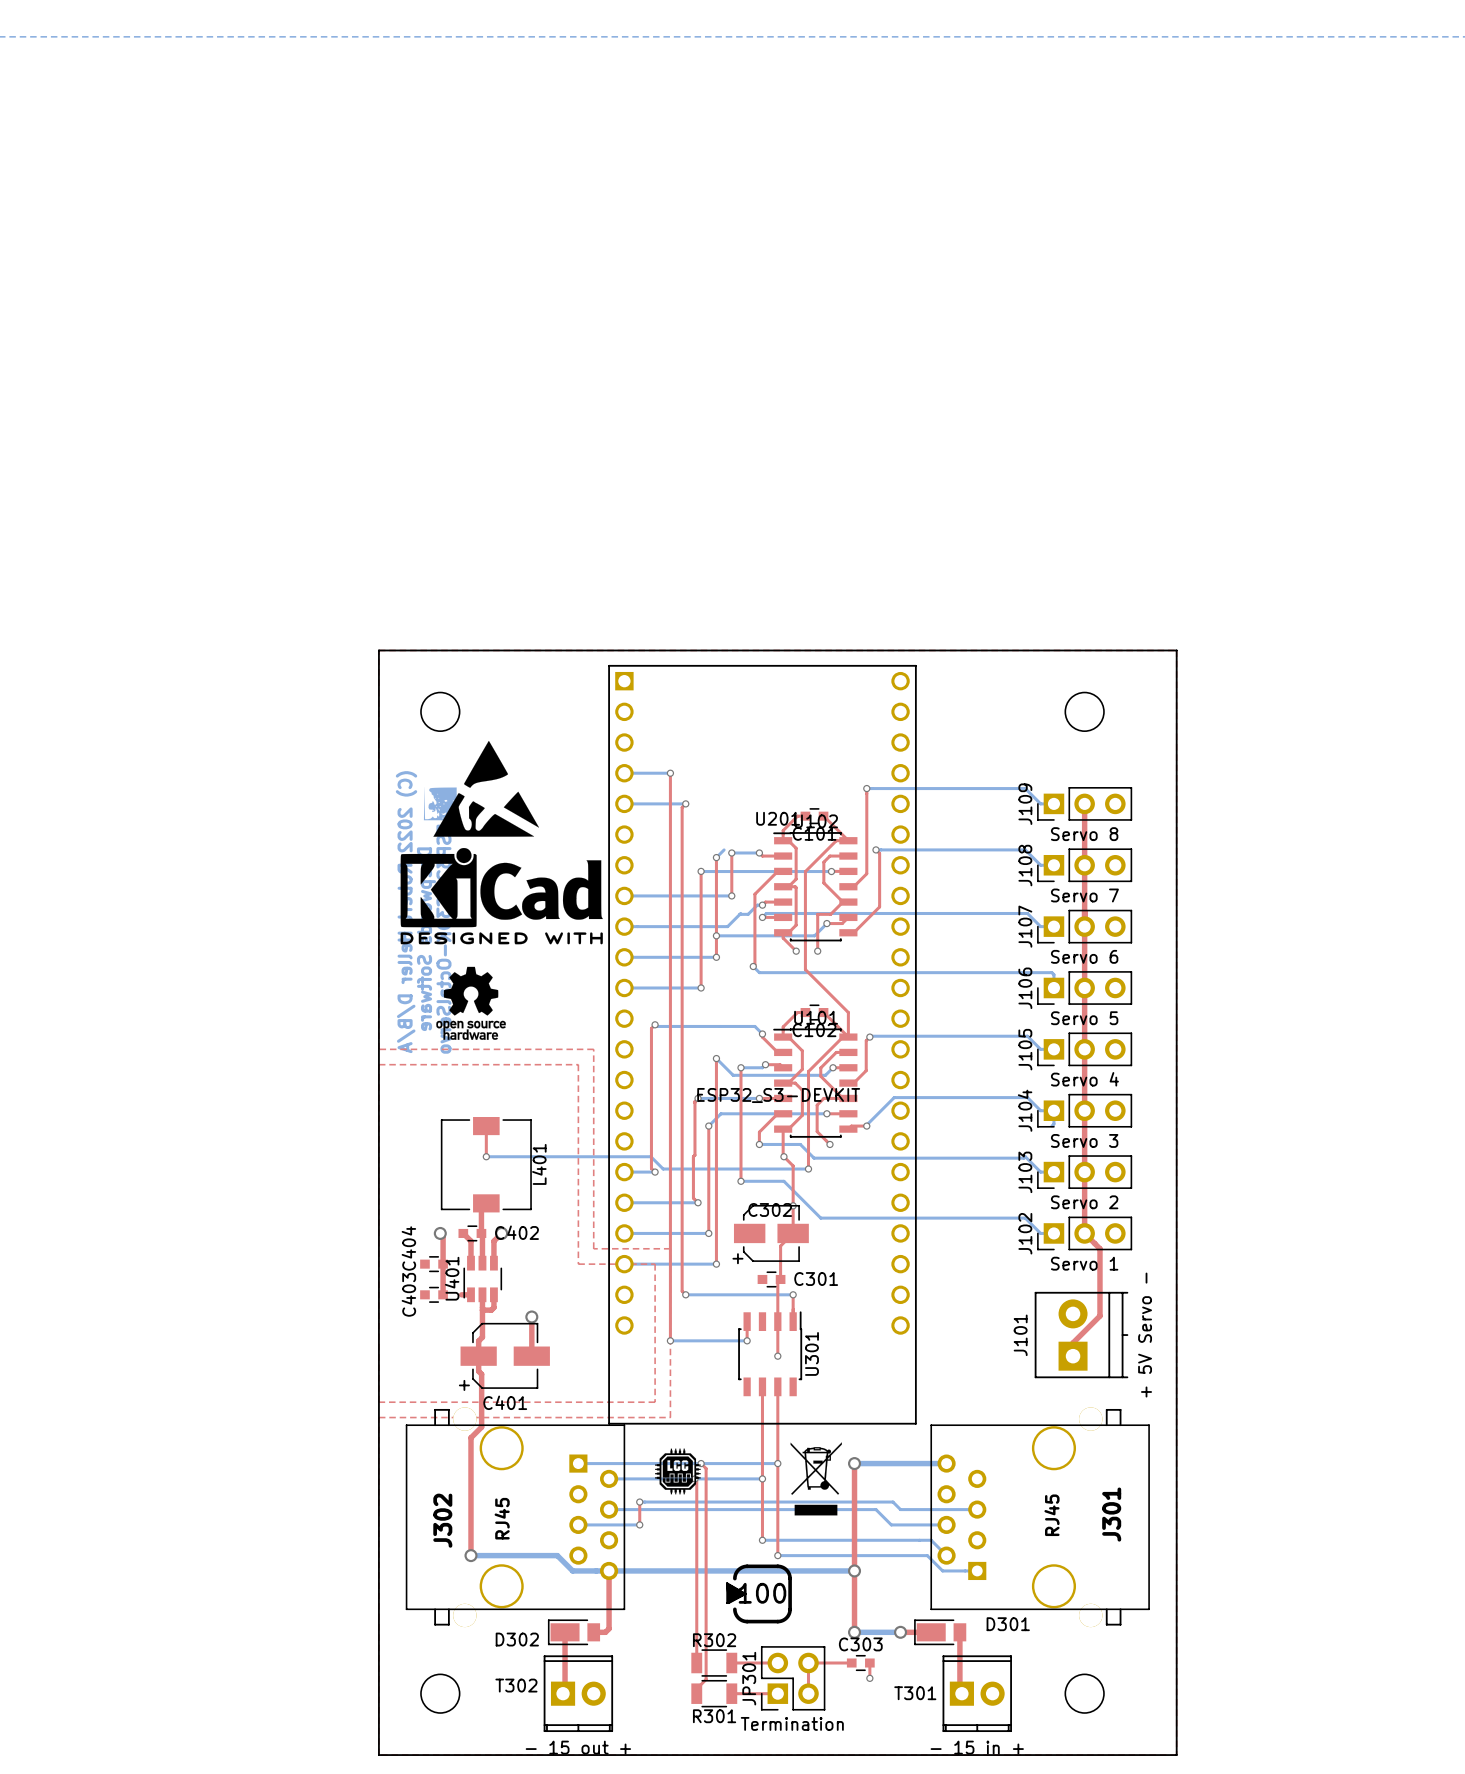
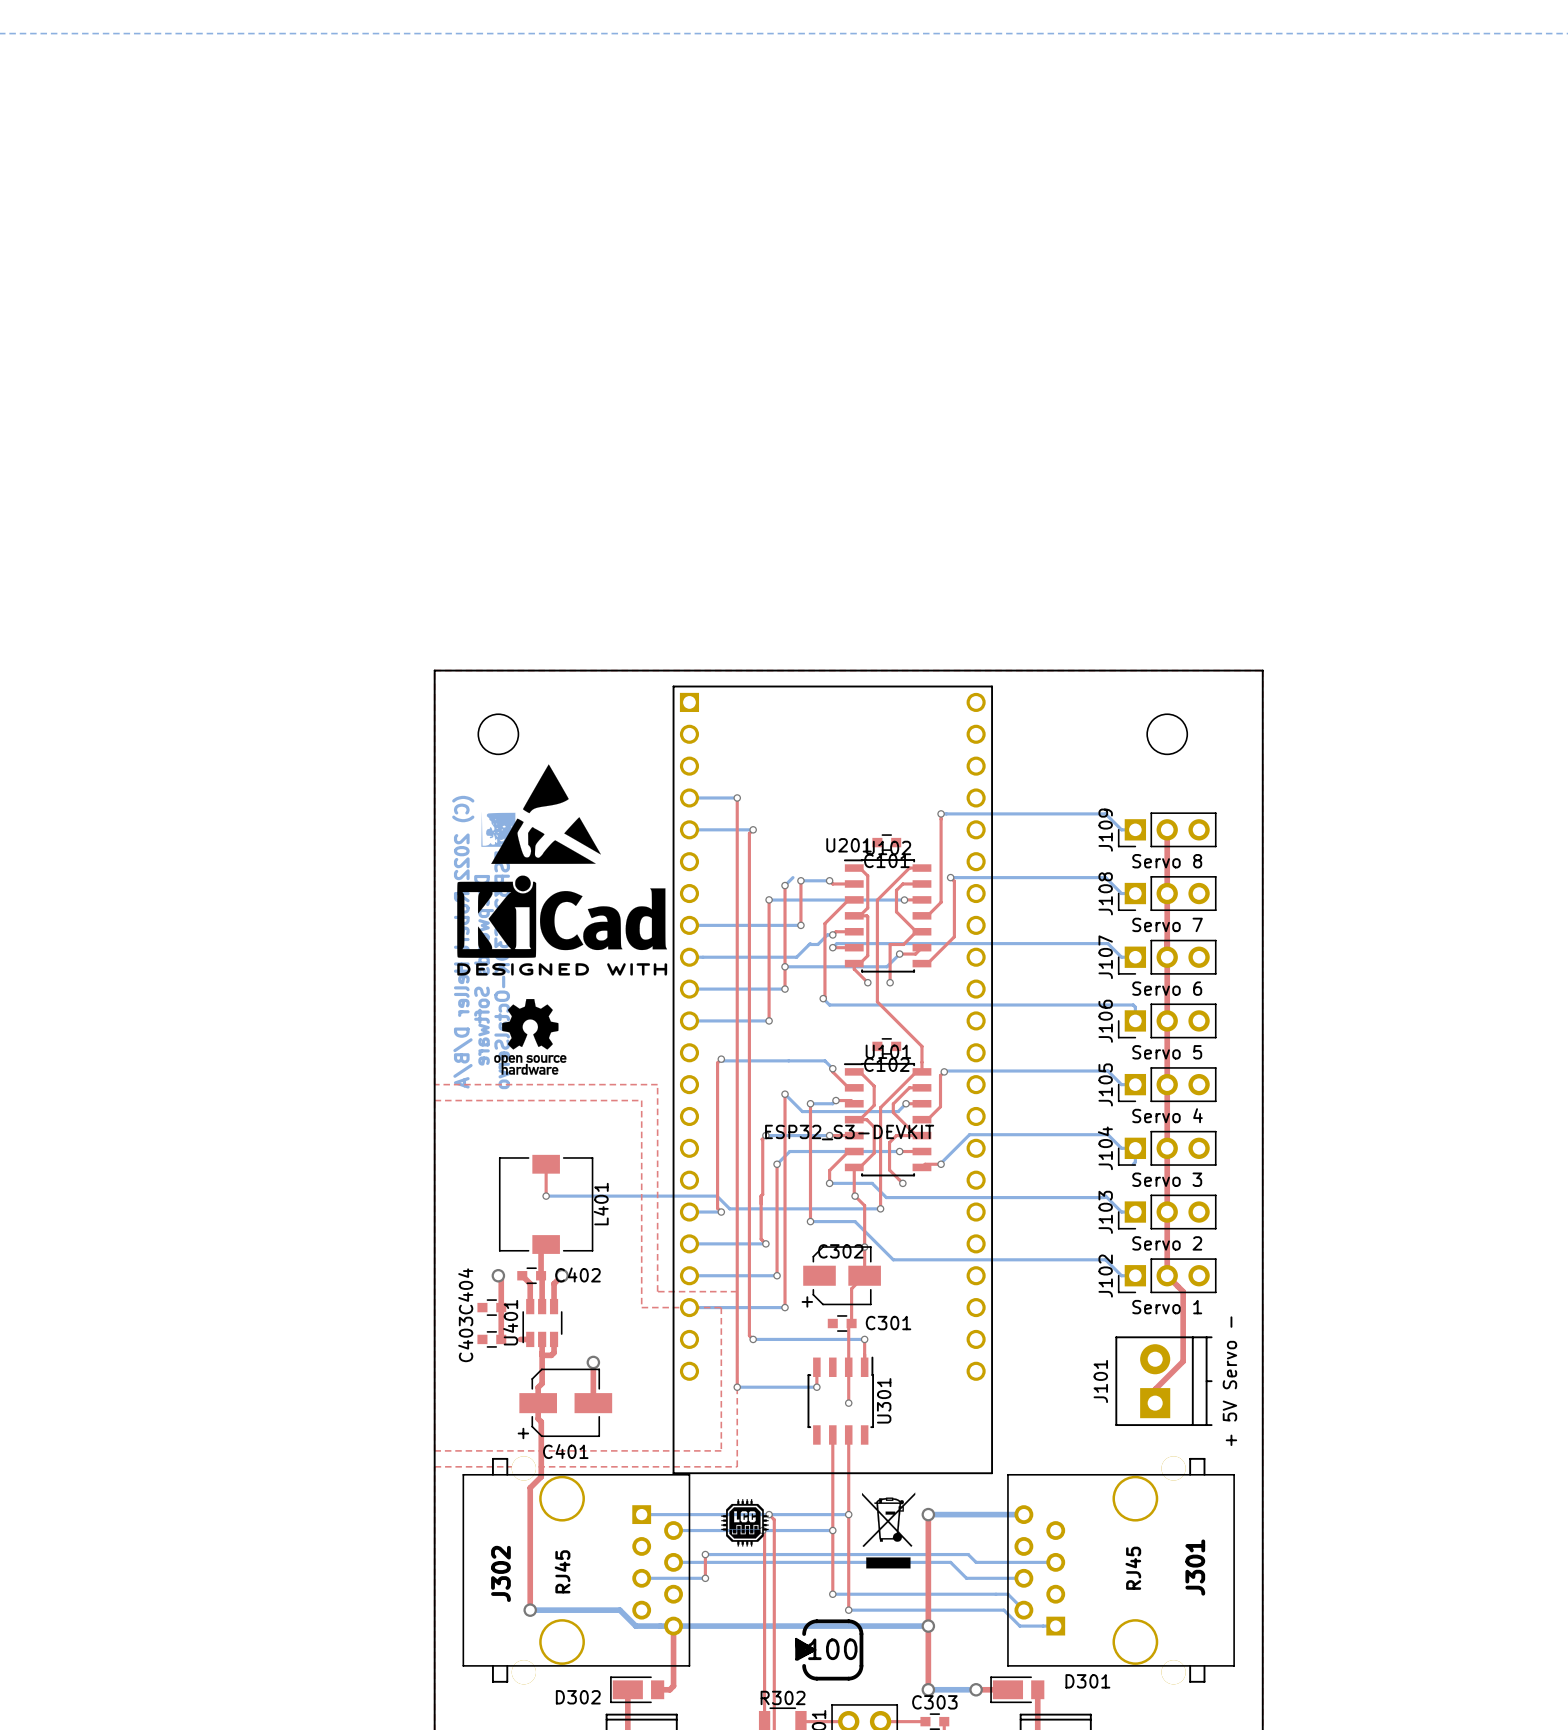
top track: (805, 816) (797, 816) (783, 830) (783, 840) -> none
top track: (823, 816) (848, 840) -> none
top track: (805, 1012) (797, 1012) (783, 1026) (783, 1037) -> none
top track: (823, 1012) (848, 1037) -> none

